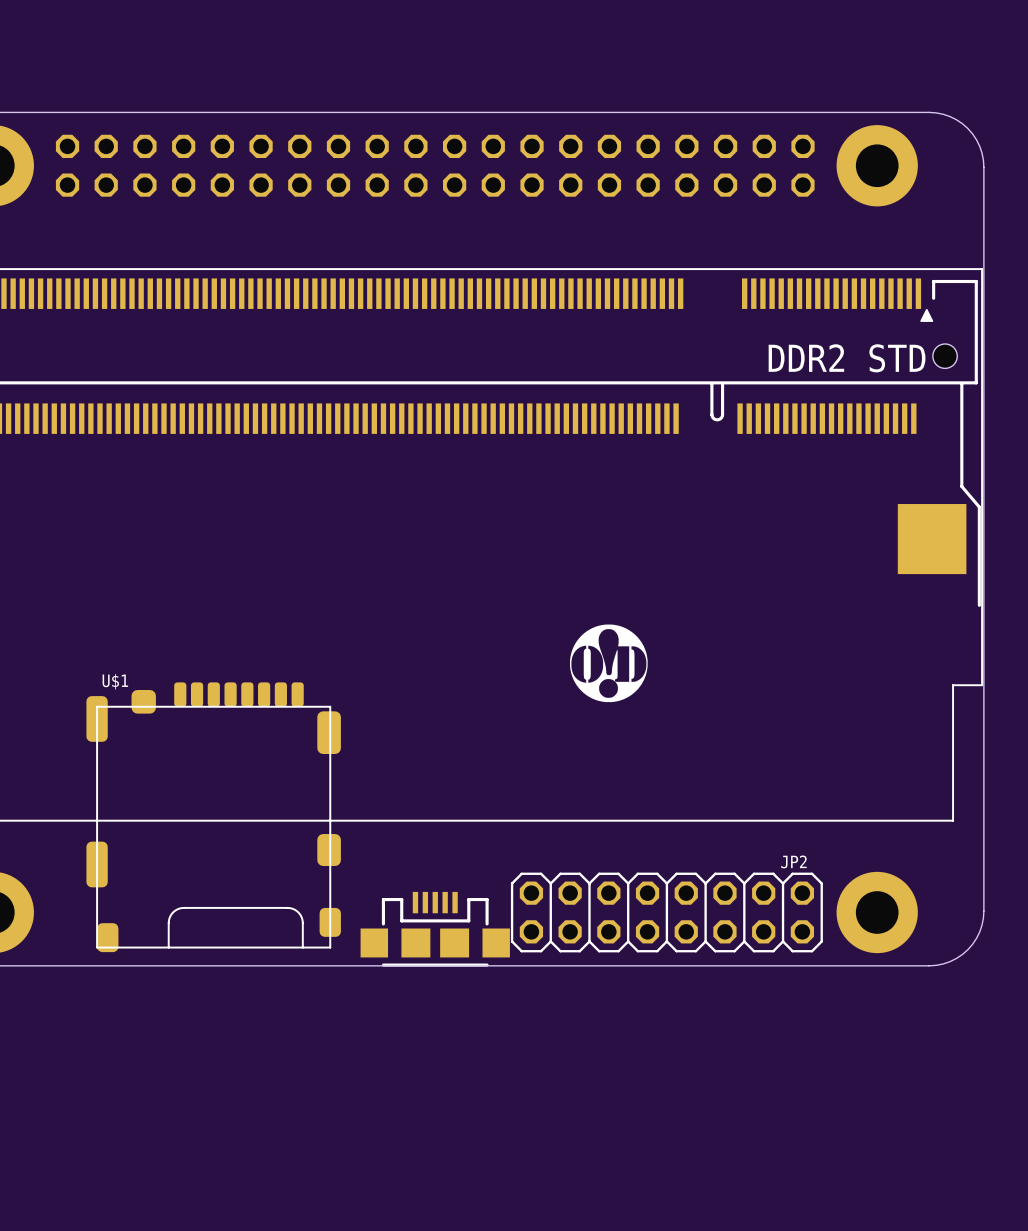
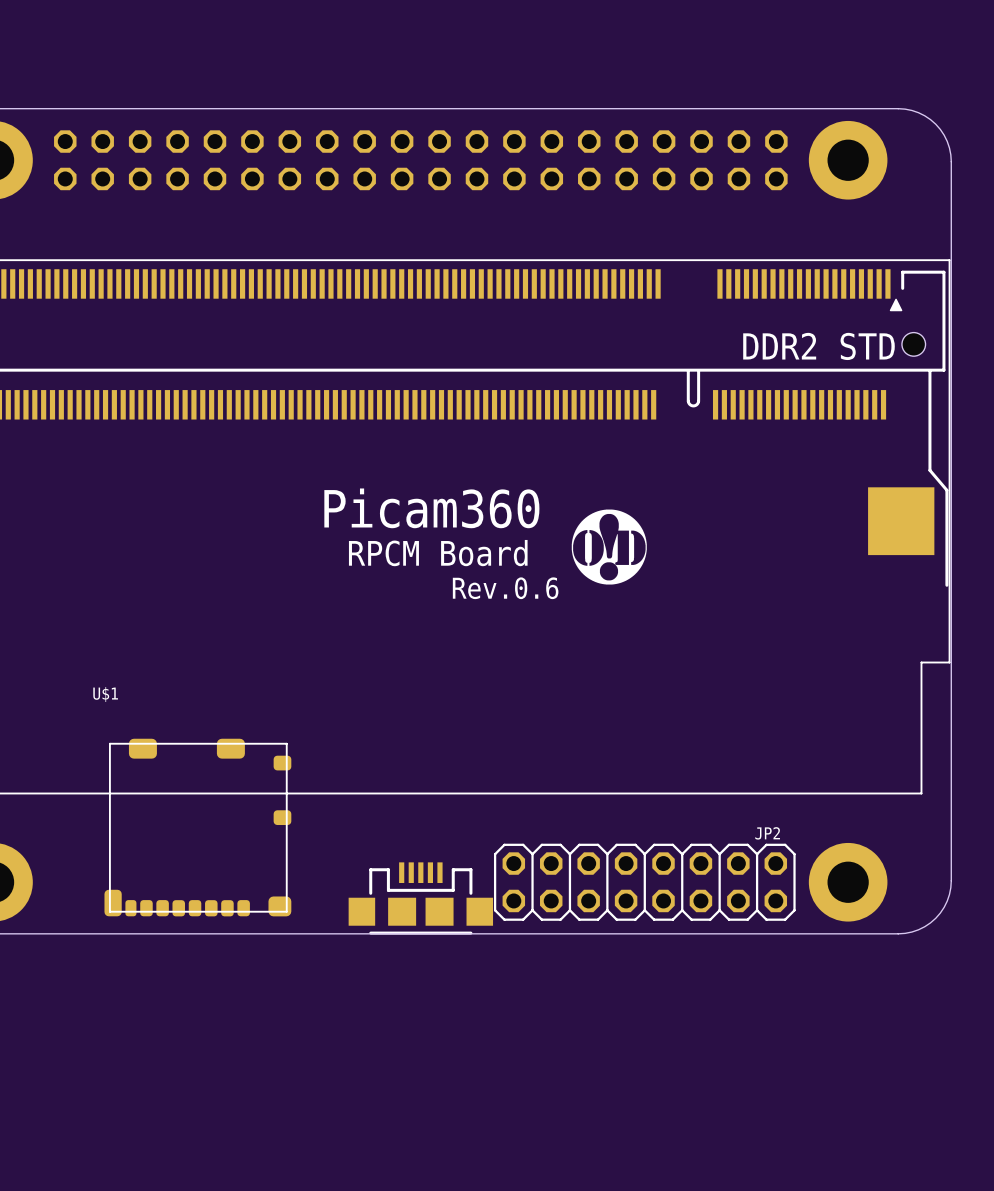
text: none -> Picam360 (431, 508)
text: none -> RPCM Board (438, 553)
text: none -> Rev.0.6 (505, 588)
drawing position: (608, 663) -> (609, 547)
U$1 footprint: [86, 682, 341, 953] -> [104, 738, 292, 917]

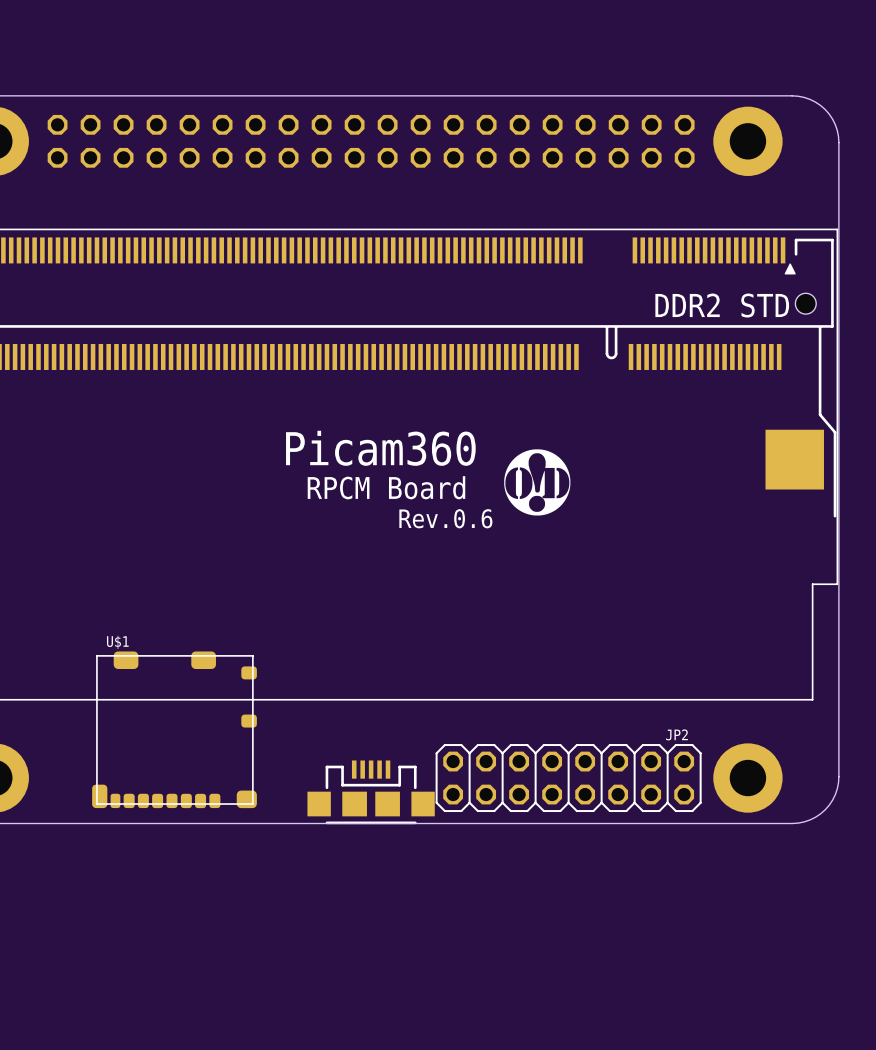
U$1 name position: U$1 (105, 694) -> U$1 (117, 642)

